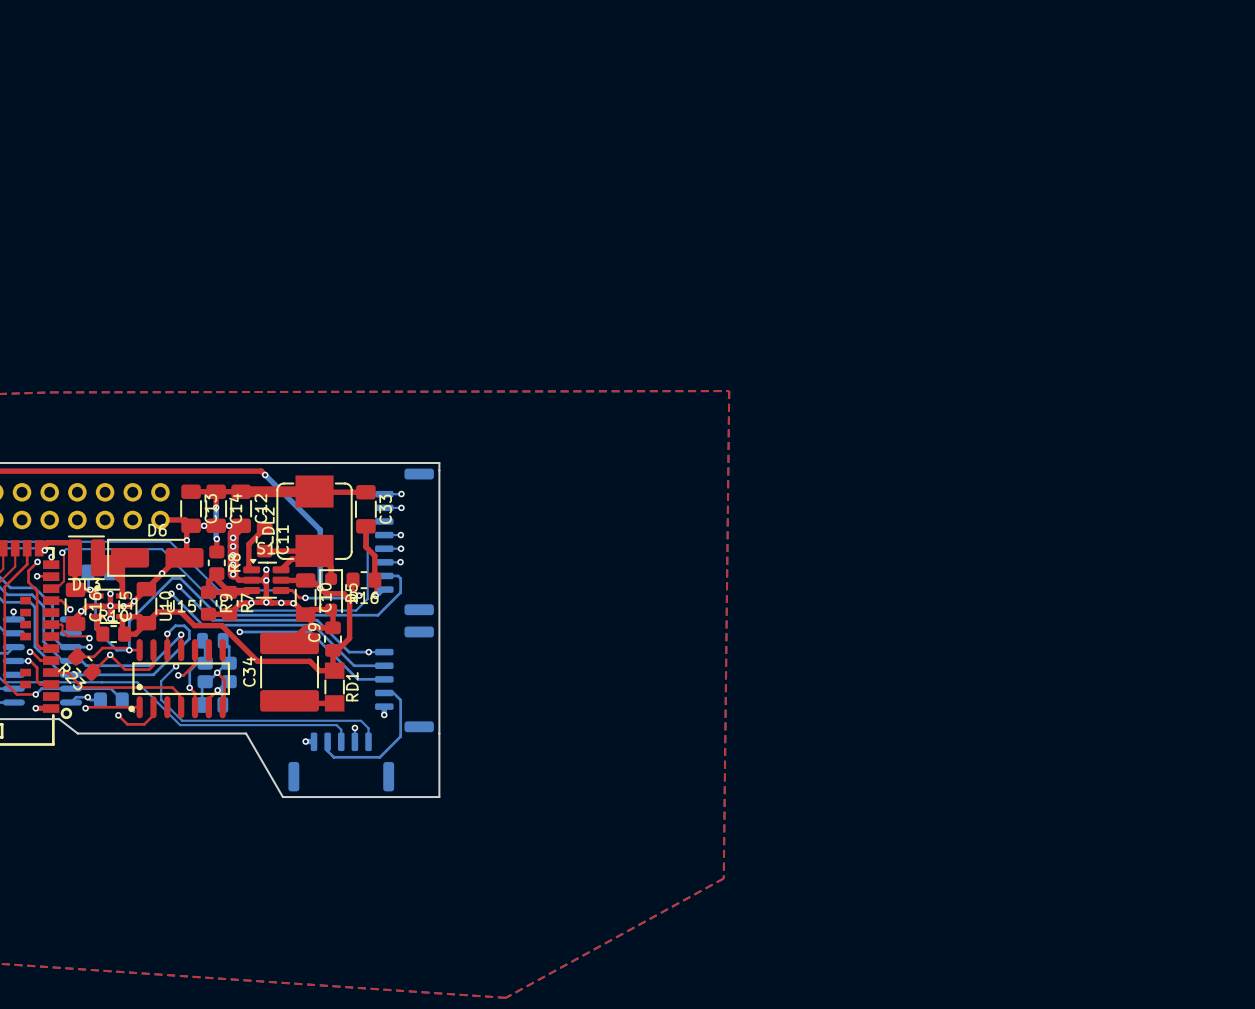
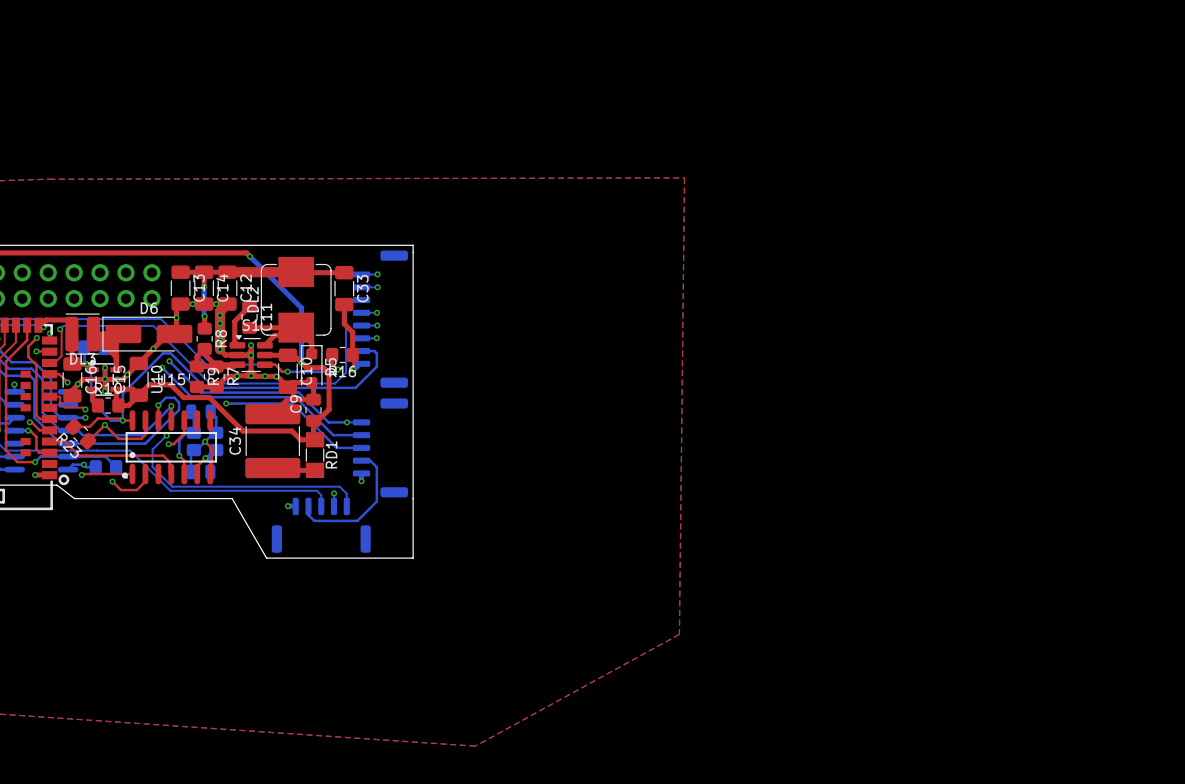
top track: (160, 519) (185, 519) (191, 525) -> none

